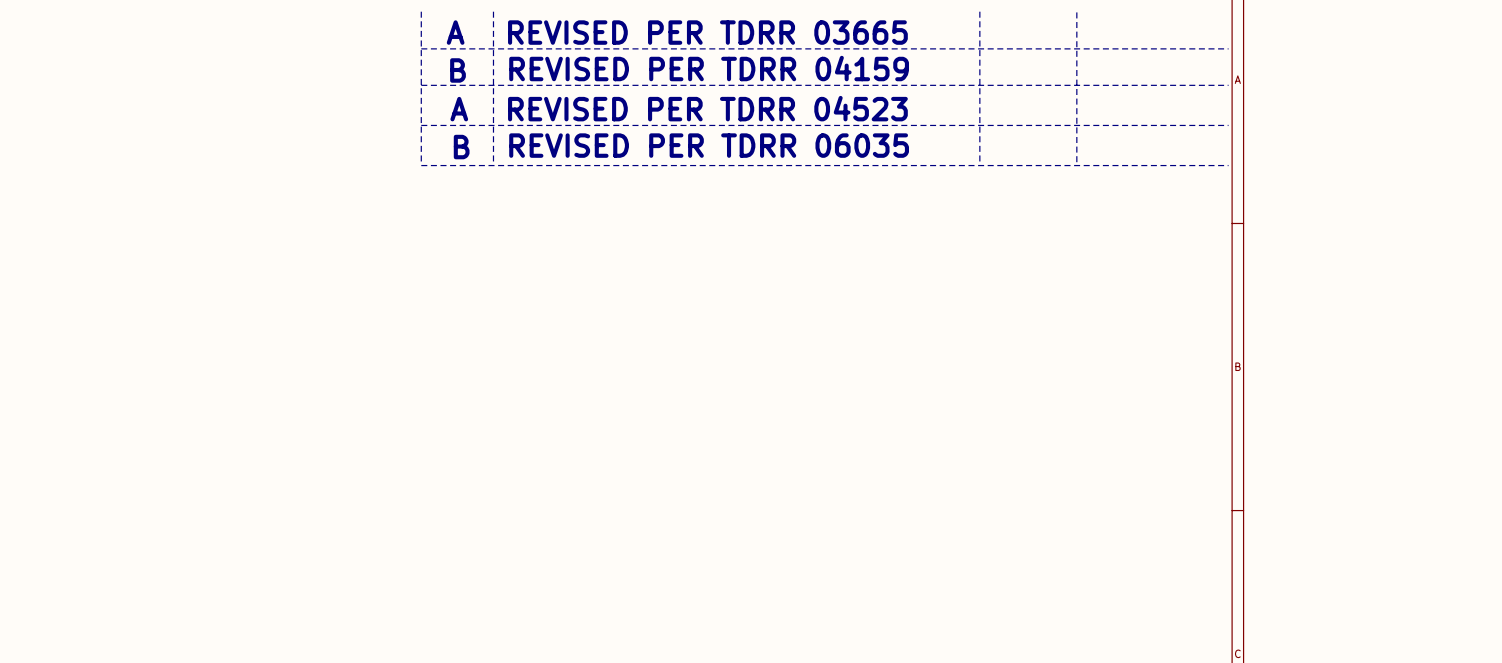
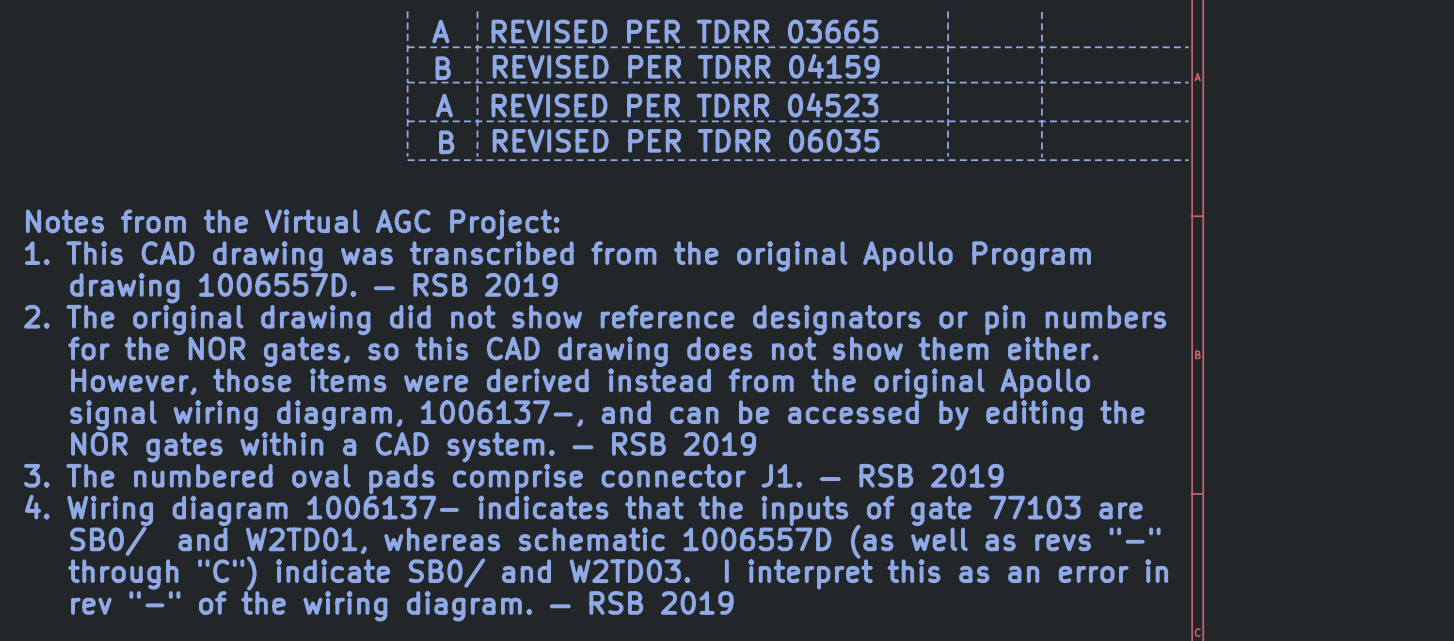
text: none -> Notes from the Virtual AGC Project: (292, 224)
text: none -> 1. This CAD drawing was transcribed from the original Apollo Program (557, 256)
text: none -> drawing 1006557D. — RSB 2019 (313, 288)
text: none -> 2. The original drawing did not show reference designators or pin numbers (595, 320)
text: none -> for the NOR gates, so this CAD drawing does not show them either. (583, 351)
text: none -> However, those items were derived instead from the original Apollo (580, 383)
text: none -> signal wiring diagram, 1006137-, and can be accessed by editing the (607, 415)
text: none -> NOR gates within a CAD system. — RSB 2019 (413, 447)
text: none -> 3. The numbered oval pads comprise connector J1. — RSB 2019 (513, 479)
text: none -> 4. Wiring diagram 1006137- indicates that the inputs of gate 77103 are (583, 510)
text: none -> SB0/ and W2TD01, whereas schematic 1006557D (as well as revs "-" (615, 541)
text: none -> through "C") indicate SB0/ and W2TD03. I interpret this as an error in (618, 573)
text: none -> rev "-" of the wiring diagram. — RSB 2019 (402, 606)

